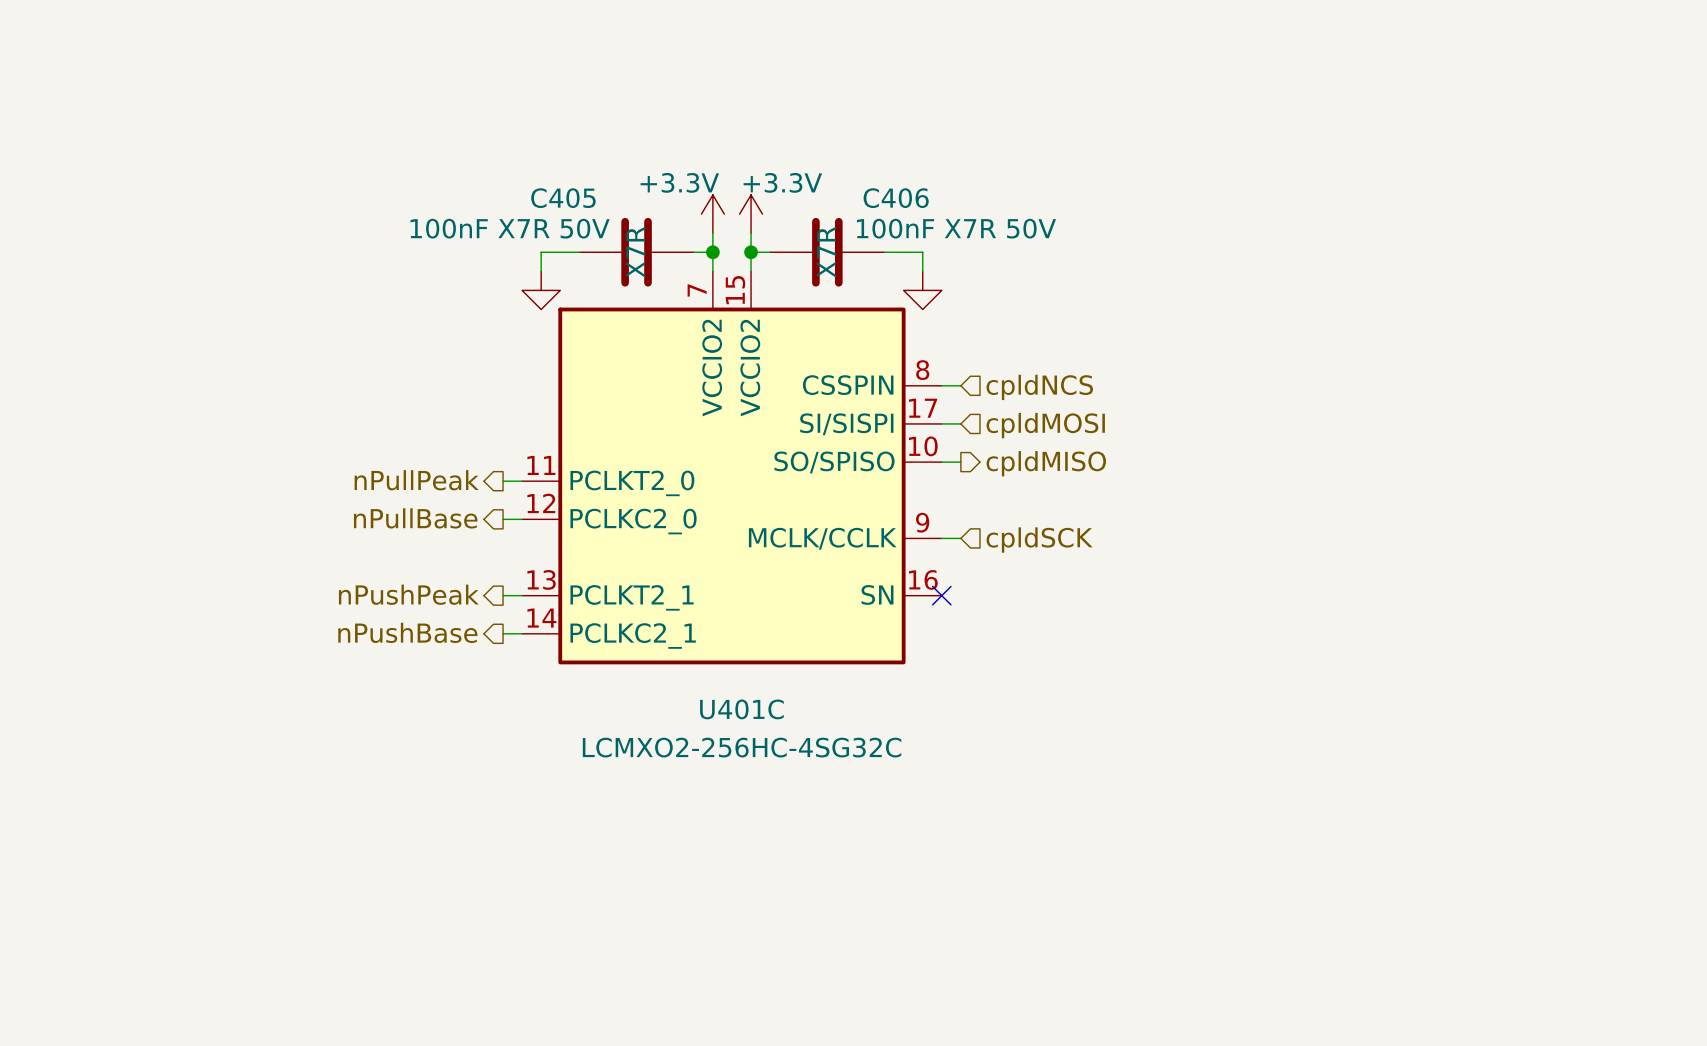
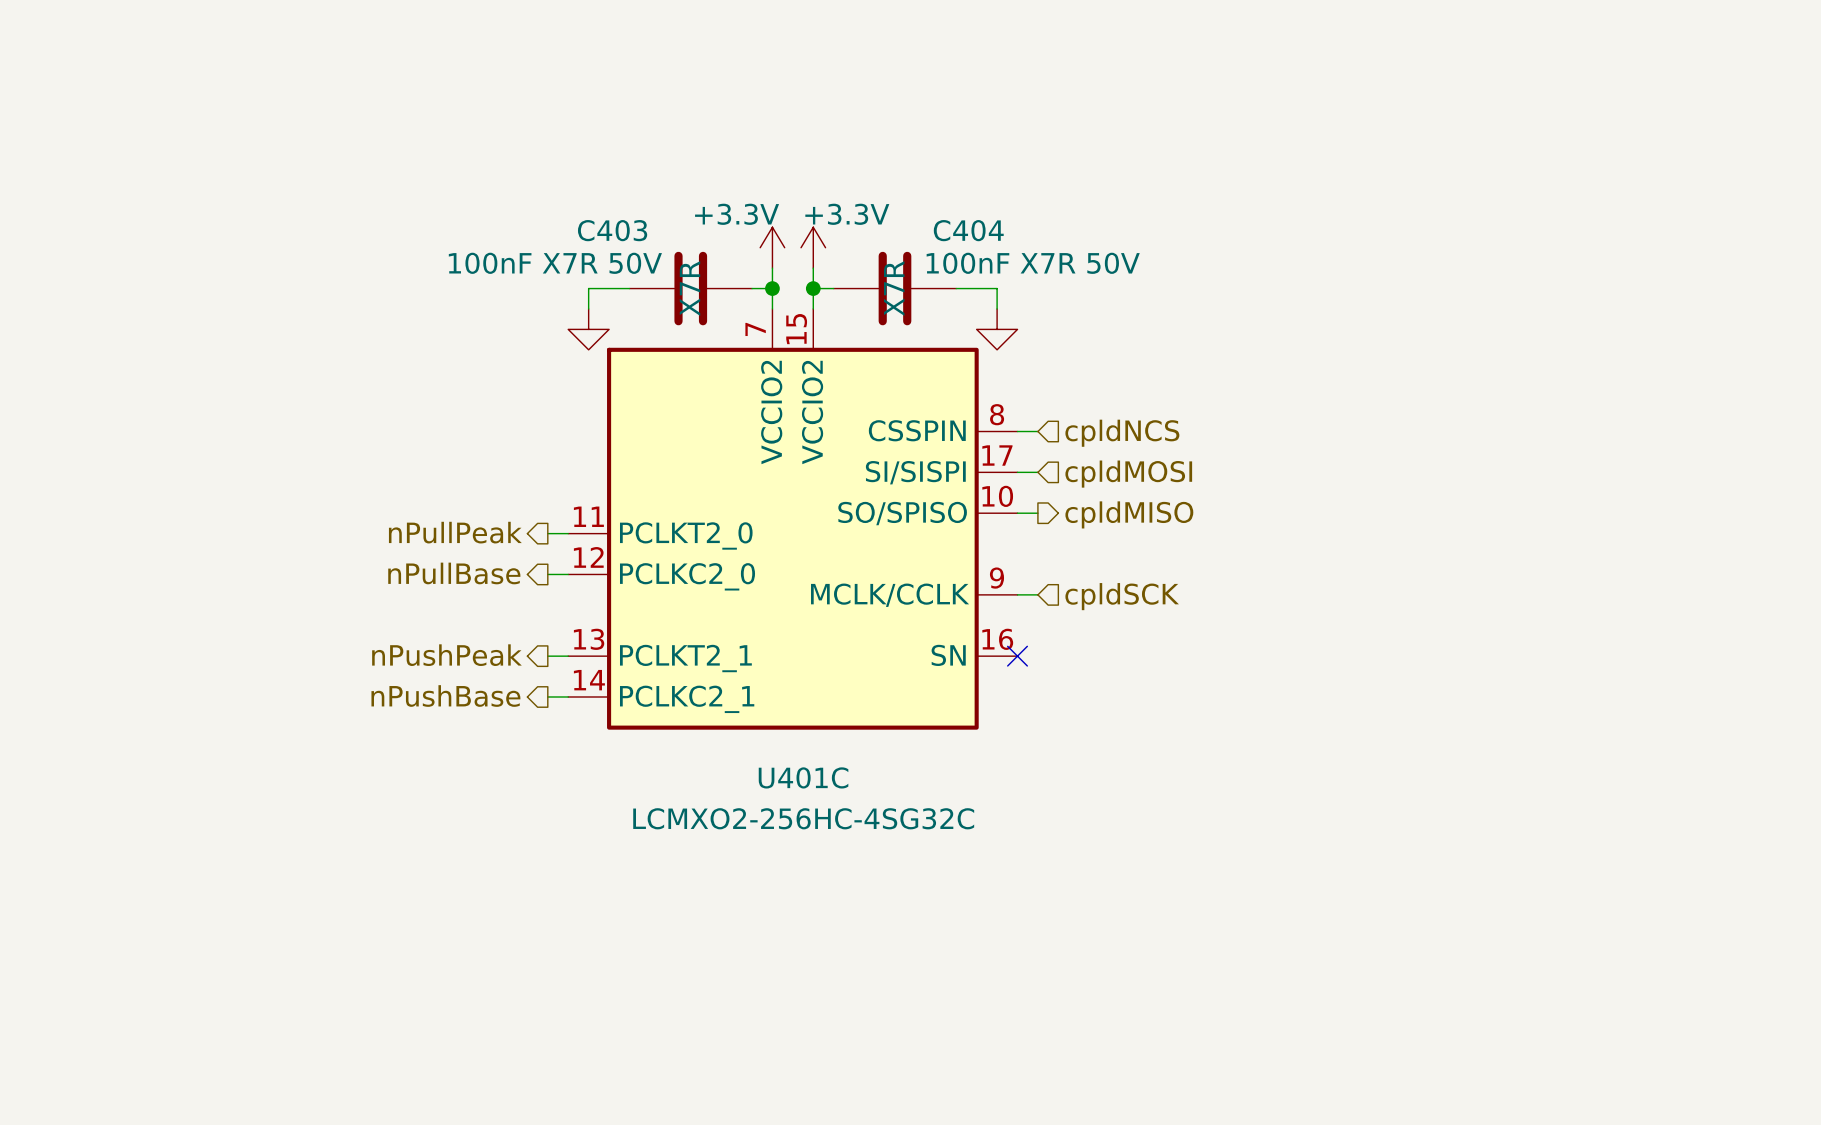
C405 name: C405 (563, 198) -> C403 (612, 230)
C406 name: C406 (896, 198) -> C404 (968, 230)

